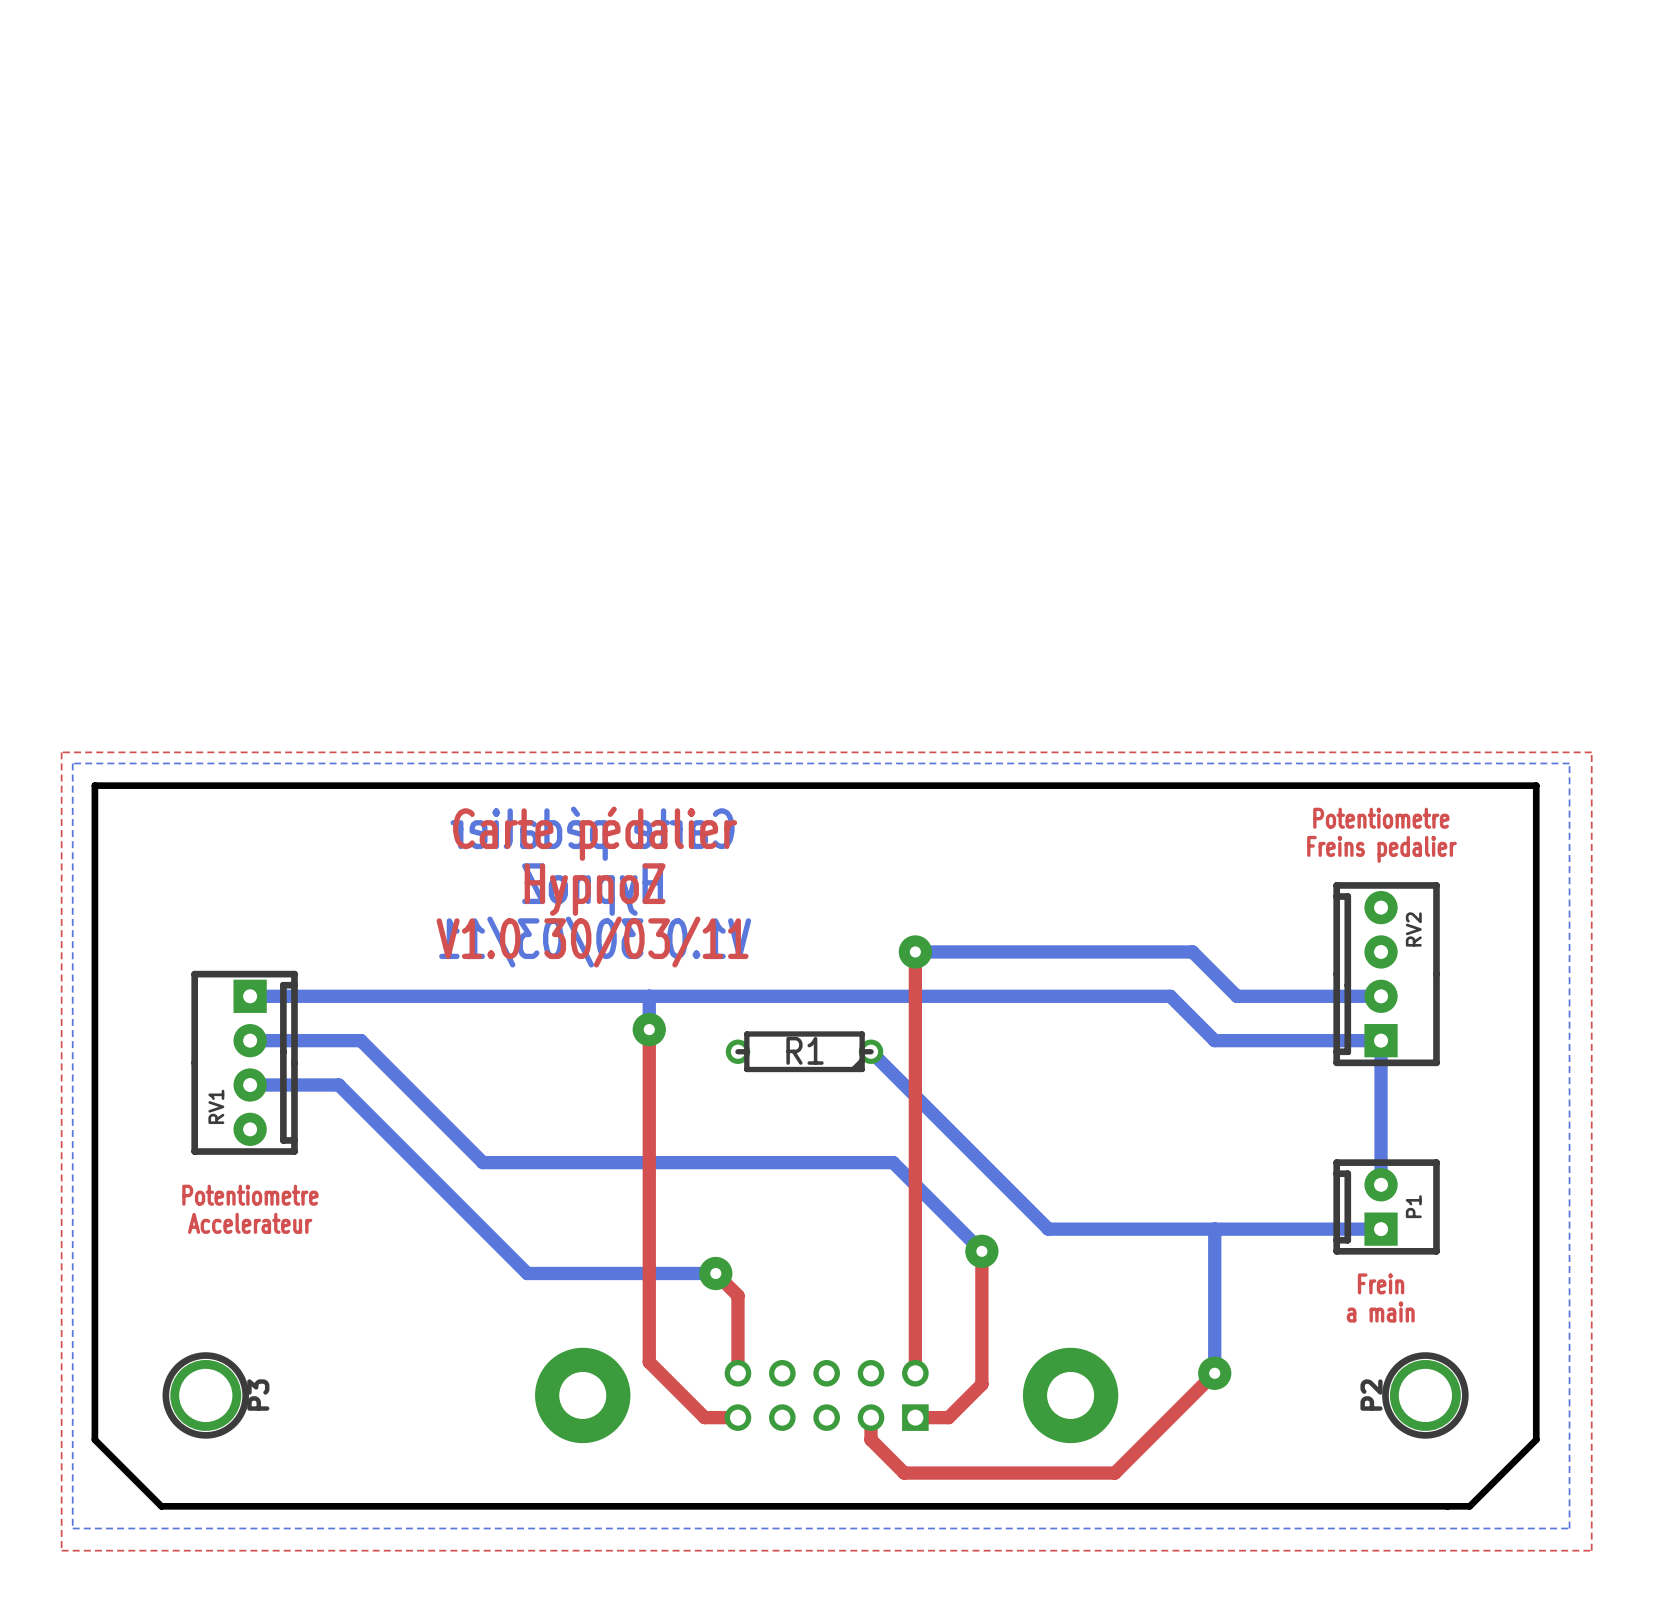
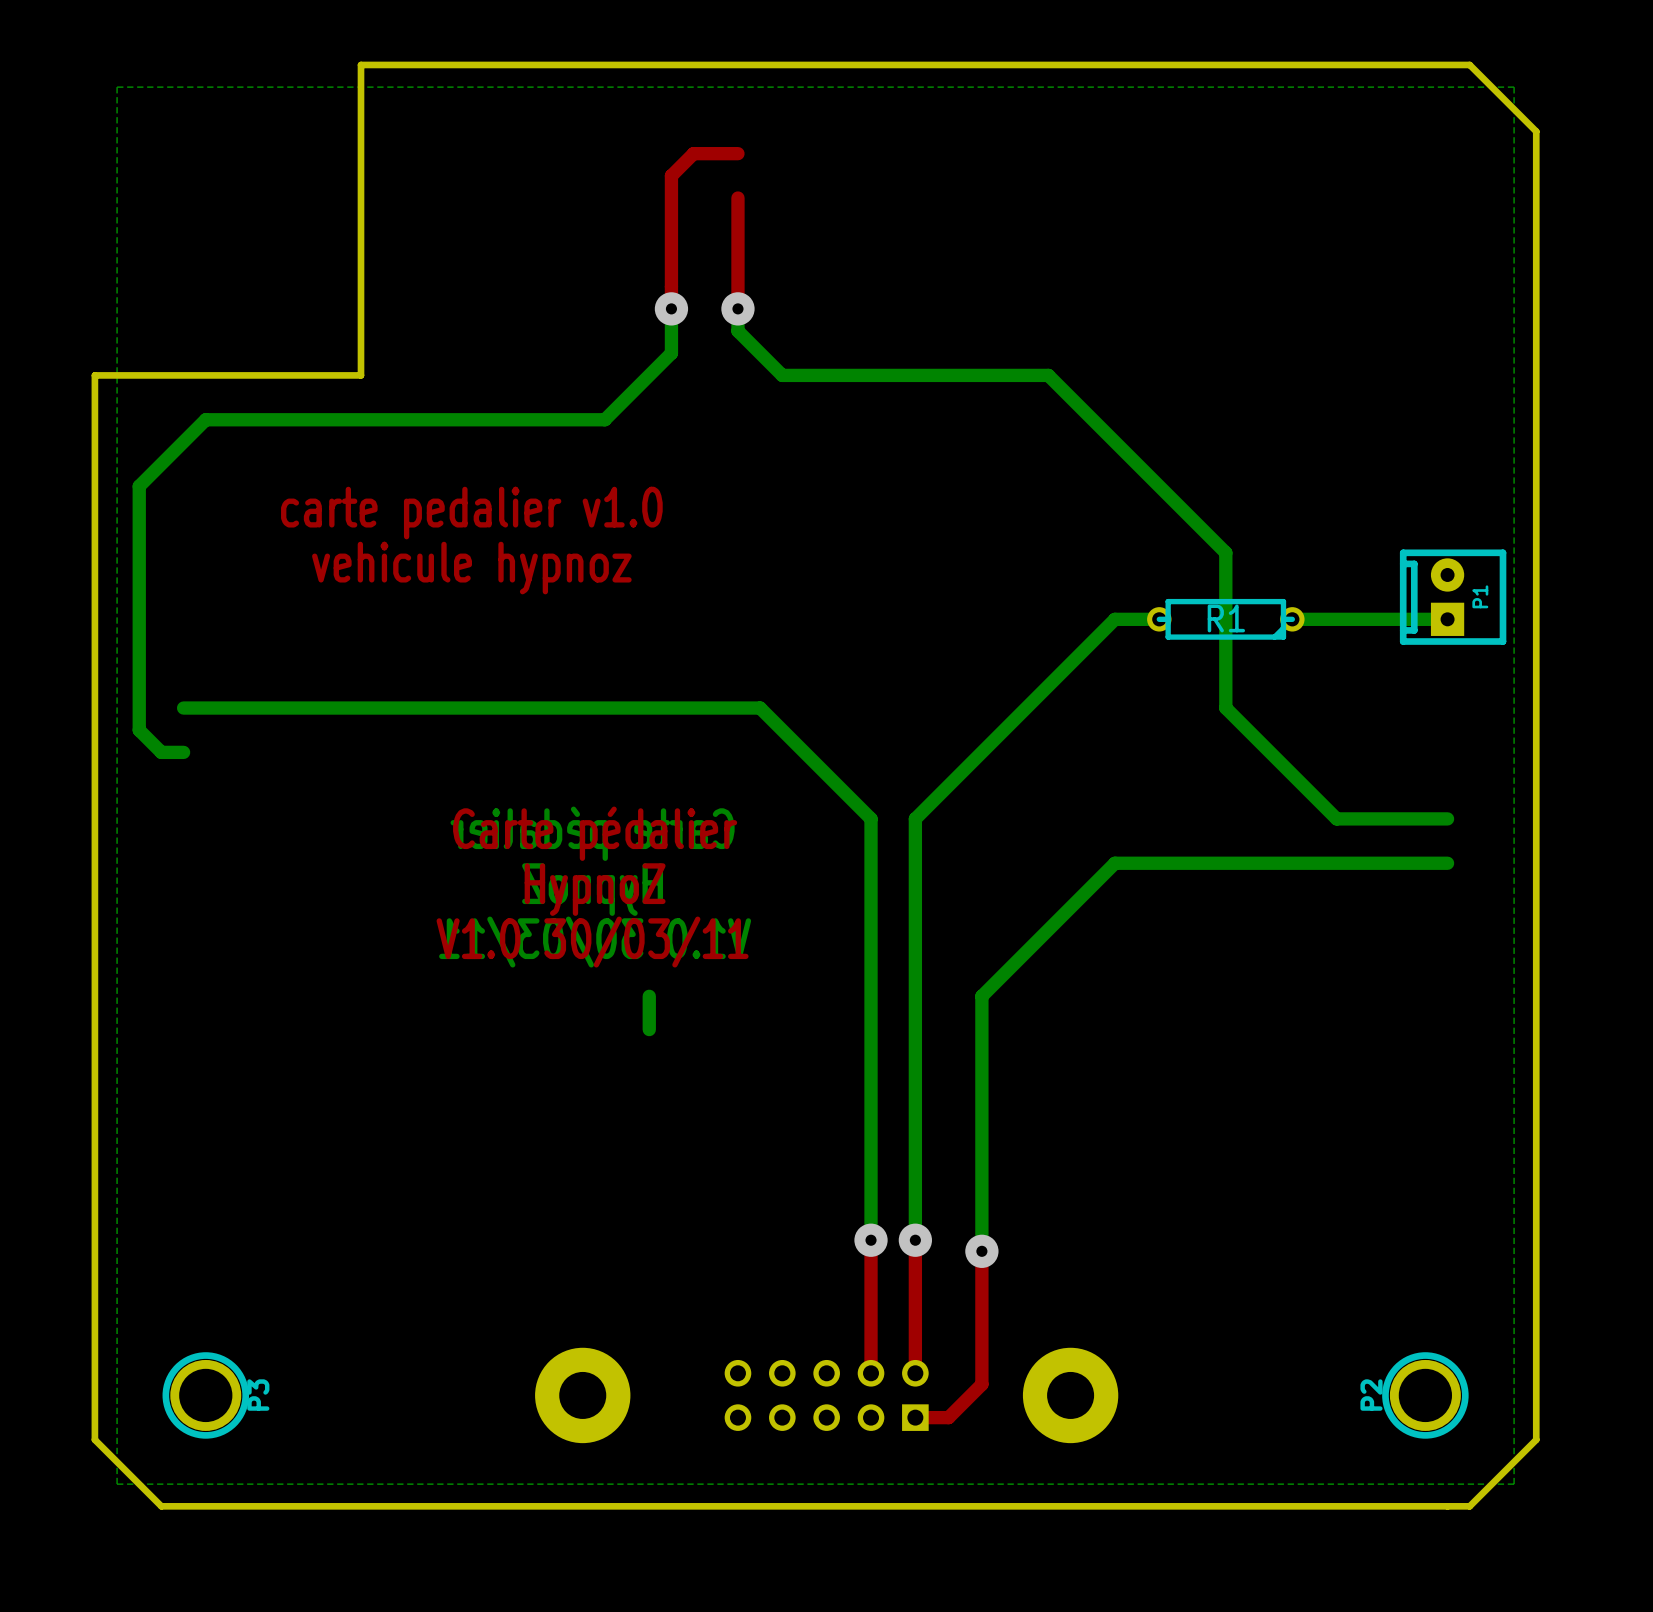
bottom zone outline: none -> (117, 87) (1514, 87) (1514, 1484) (117, 1484) (117, 87)
top track: none -> (737, 153) (693, 153) (671, 175) (671, 308)
top track: none -> (737, 198) (737, 308)
bottom track: none -> (671, 308) (671, 353) (604, 419) (205, 419) (139, 486) (139, 730) (161, 752) (183, 752)
via: none -> (671, 308)
bottom track: none -> (737, 308) (737, 331) (782, 375) (1048, 375) (1225, 552) (1225, 708) (1336, 818) (1447, 818)
via: none -> (737, 308)
text: none -> carte pedalier v1.0 (471, 513)
text: none -> vehicule hypnoz (471, 568)
bottom track: none -> (1159, 619) (1114, 619) (915, 818) (915, 1240)
bottom track: none -> (1292, 619) (1447, 619)
bottom track: none -> (183, 708) (760, 708) (871, 818) (871, 1240)
top zone outline: (61, 752) (1591, 752) (1591, 1550) (61, 1550) (61, 752) -> none
bottom zone outline: (72, 763) (1569, 763) (1569, 1528) (72, 1528) (72, 763) -> none
board edge: (94, 785) (1536, 785) -> (94, 785) (94, 375) (361, 375) (361, 64) (1469, 64) (1536, 131) (1536, 785)
text: Potentiometre (1381, 818) -> none
text: Freins pedalier (1381, 849) -> none
bottom track: none -> (1447, 863) (1114, 863) (981, 996) (981, 1240)
top track: (915, 951) (915, 1240) -> none
bottom track: (915, 951) (1192, 951) (1236, 996) (1381, 996) -> none
via: (915, 951) -> none
RV2: (1386, 974) -> none
bottom track: (250, 996) (1170, 996) (1214, 1040) (1381, 1040) (1381, 1184) -> none
top track: (649, 1029) (649, 1362) (704, 1417) (737, 1417) -> none
via: (649, 1029) -> none
bottom track: (250, 1040) (361, 1040) (482, 1162) (893, 1162) (981, 1251) -> none
R1 position: (804, 1051) -> (1225, 619)
bottom track: (871, 1051) (1048, 1229) (1381, 1229) -> none
RV1: (244, 1062) -> none
bottom track: (250, 1085) (338, 1085) (527, 1273) (715, 1273) -> none
text: Potentiometre (250, 1195) -> none
P1 position: (1386, 1206) -> (1453, 597)
text: Accelerateur (250, 1223) -> none
bottom track: (1214, 1229) (1214, 1373) -> none
top track: none -> (871, 1240) (871, 1373)
via: none -> (871, 1240)
via: none -> (915, 1240)
top track: (715, 1273) (737, 1295) (737, 1373) -> none
via: (715, 1273) -> none
text: Frein (1381, 1283) -> none
text: a main (1380, 1312) -> none
top track: (1214, 1373) (1114, 1473) (904, 1473) (871, 1439) (871, 1417) -> none
via: (1214, 1373) -> none

